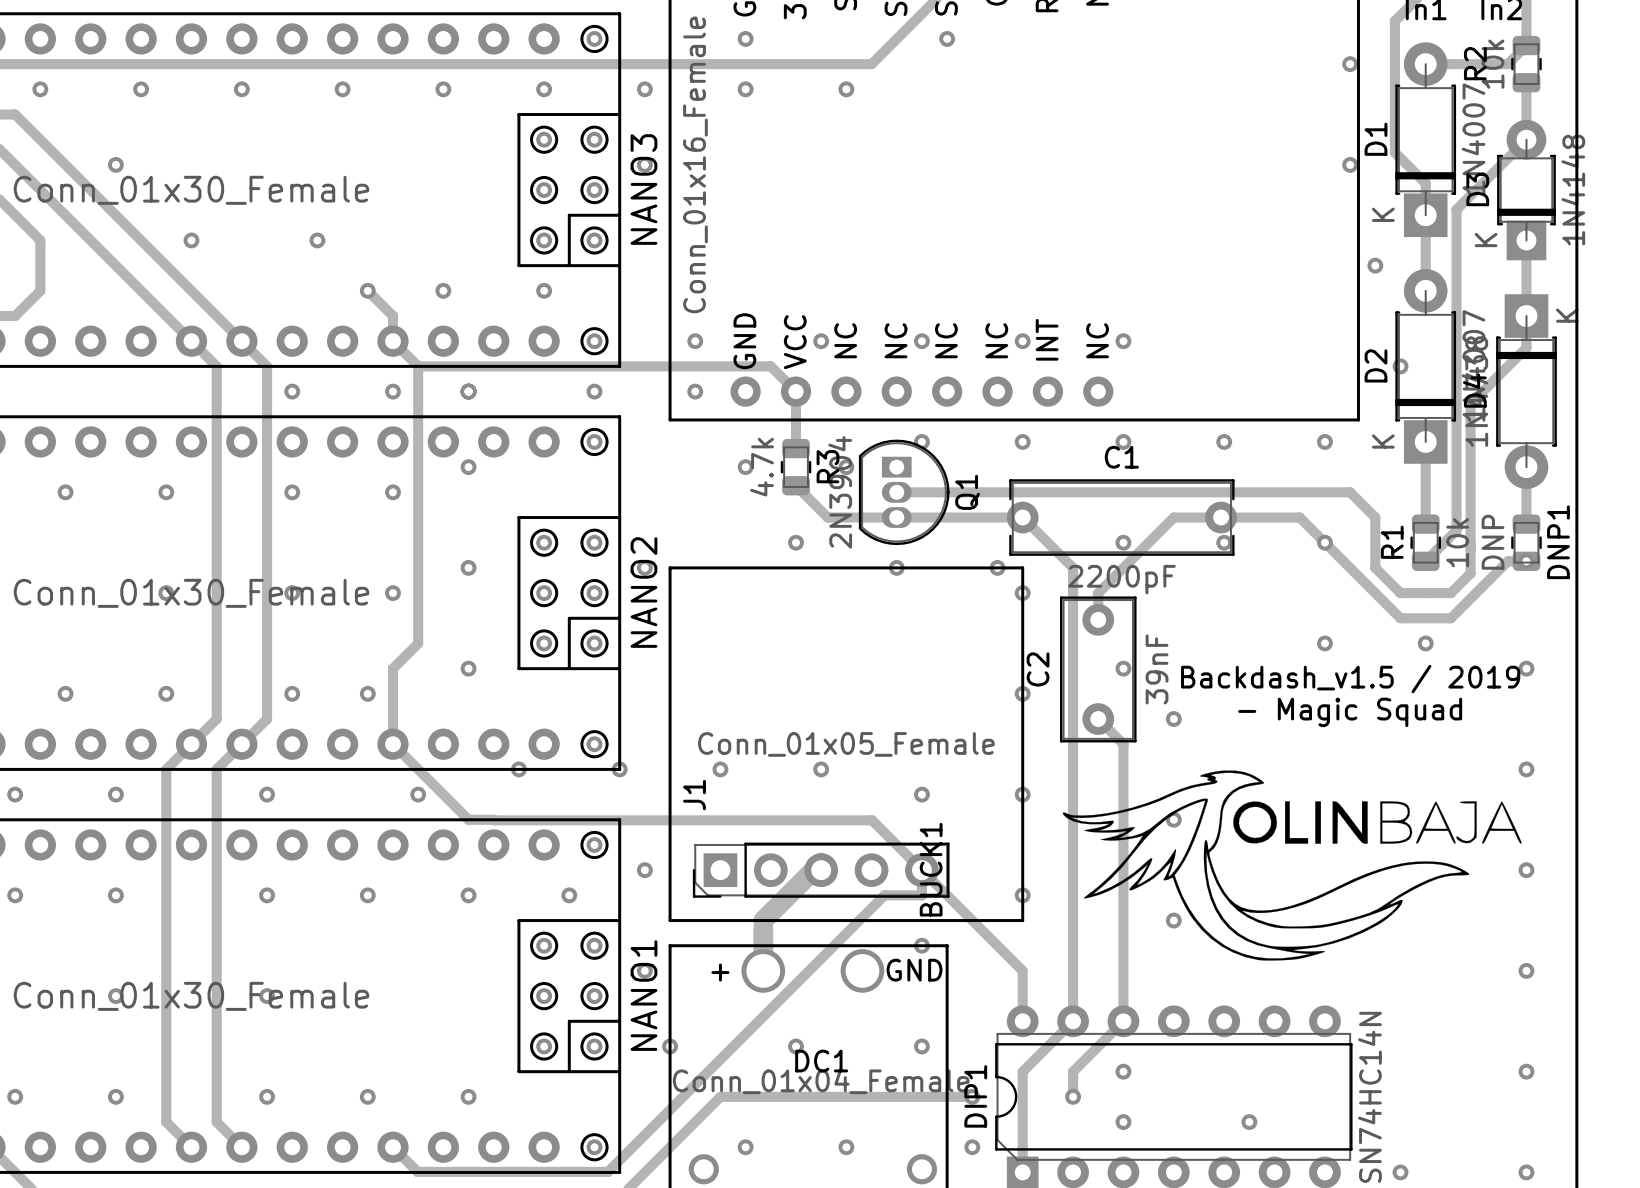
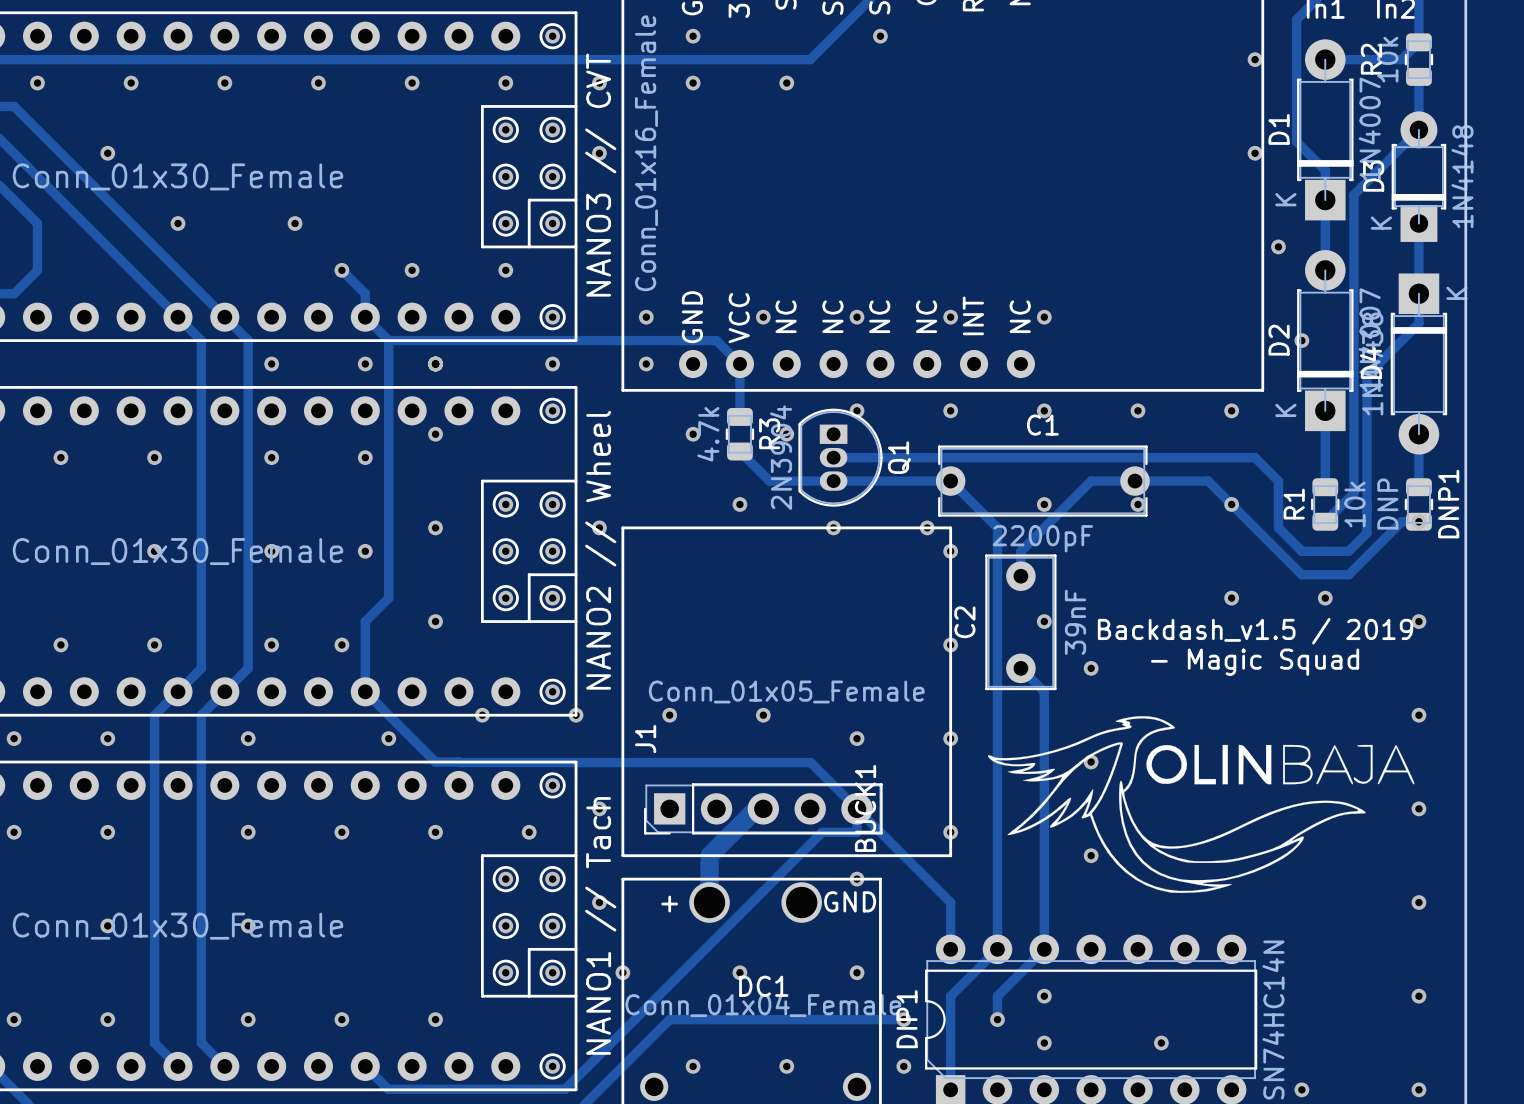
NANO3 name: NANO3 (643, 189) -> NANO3 // CVT (600, 175)
NANO2 name: NANO2 (643, 592) -> NANO2 // Wheel (600, 550)
NANO1 name: NANO1 (643, 995) -> NANO1 // Tach (600, 925)

